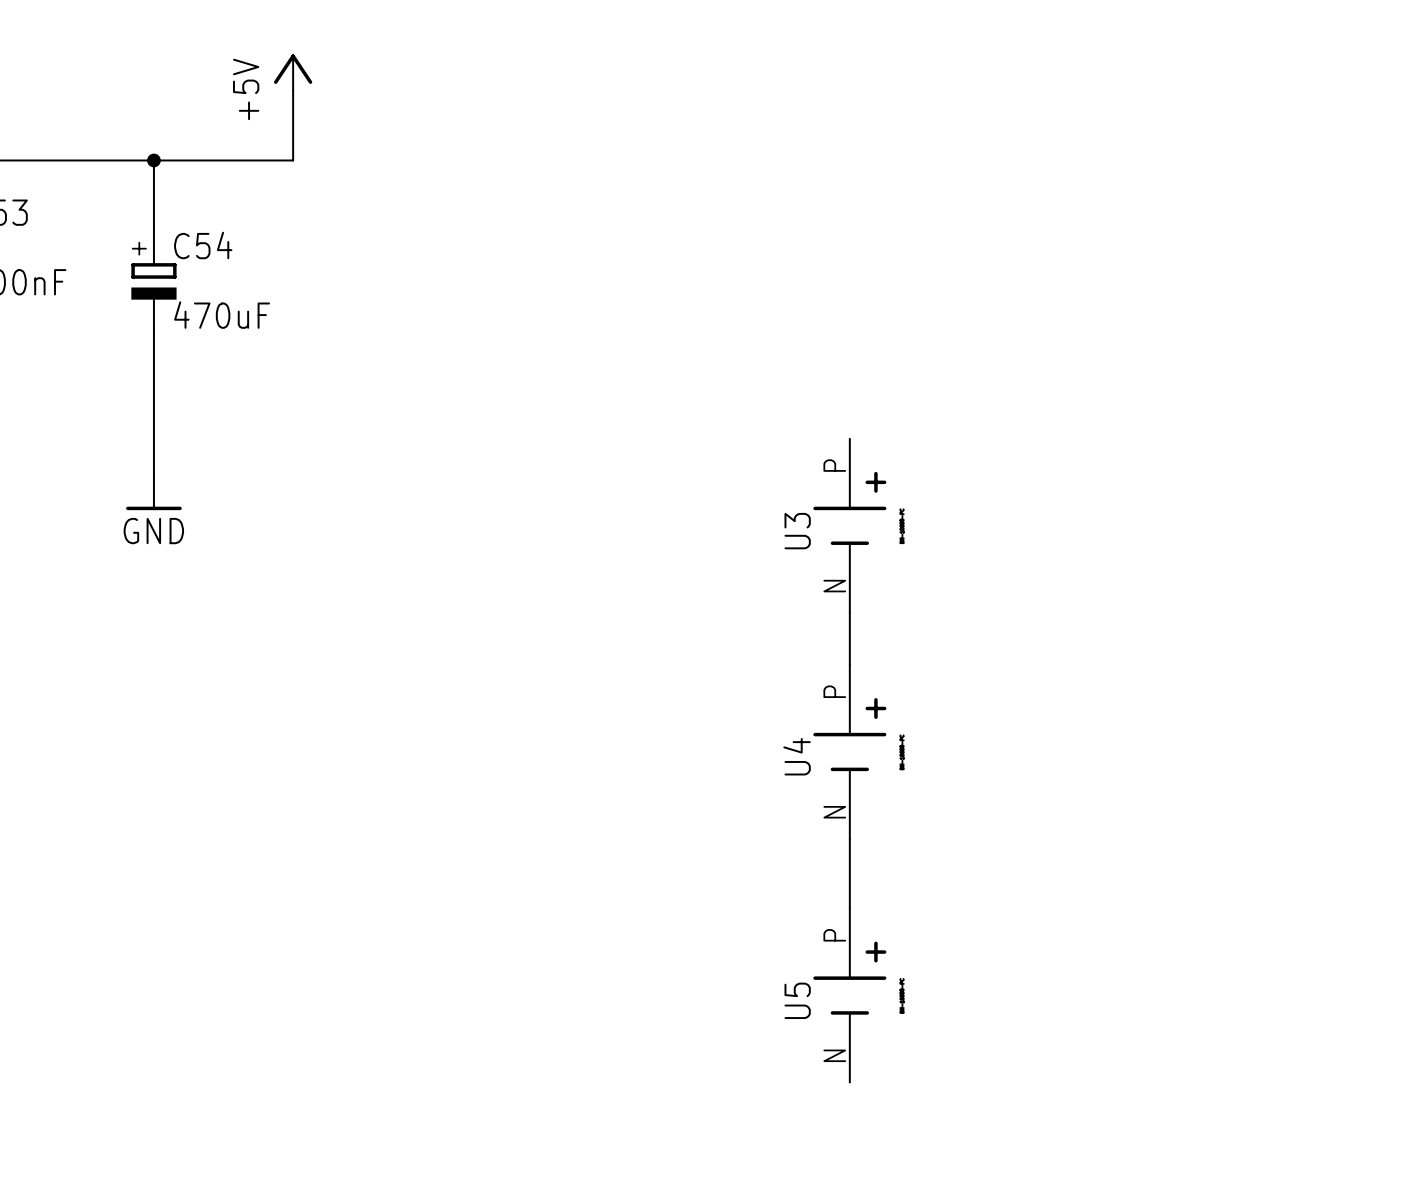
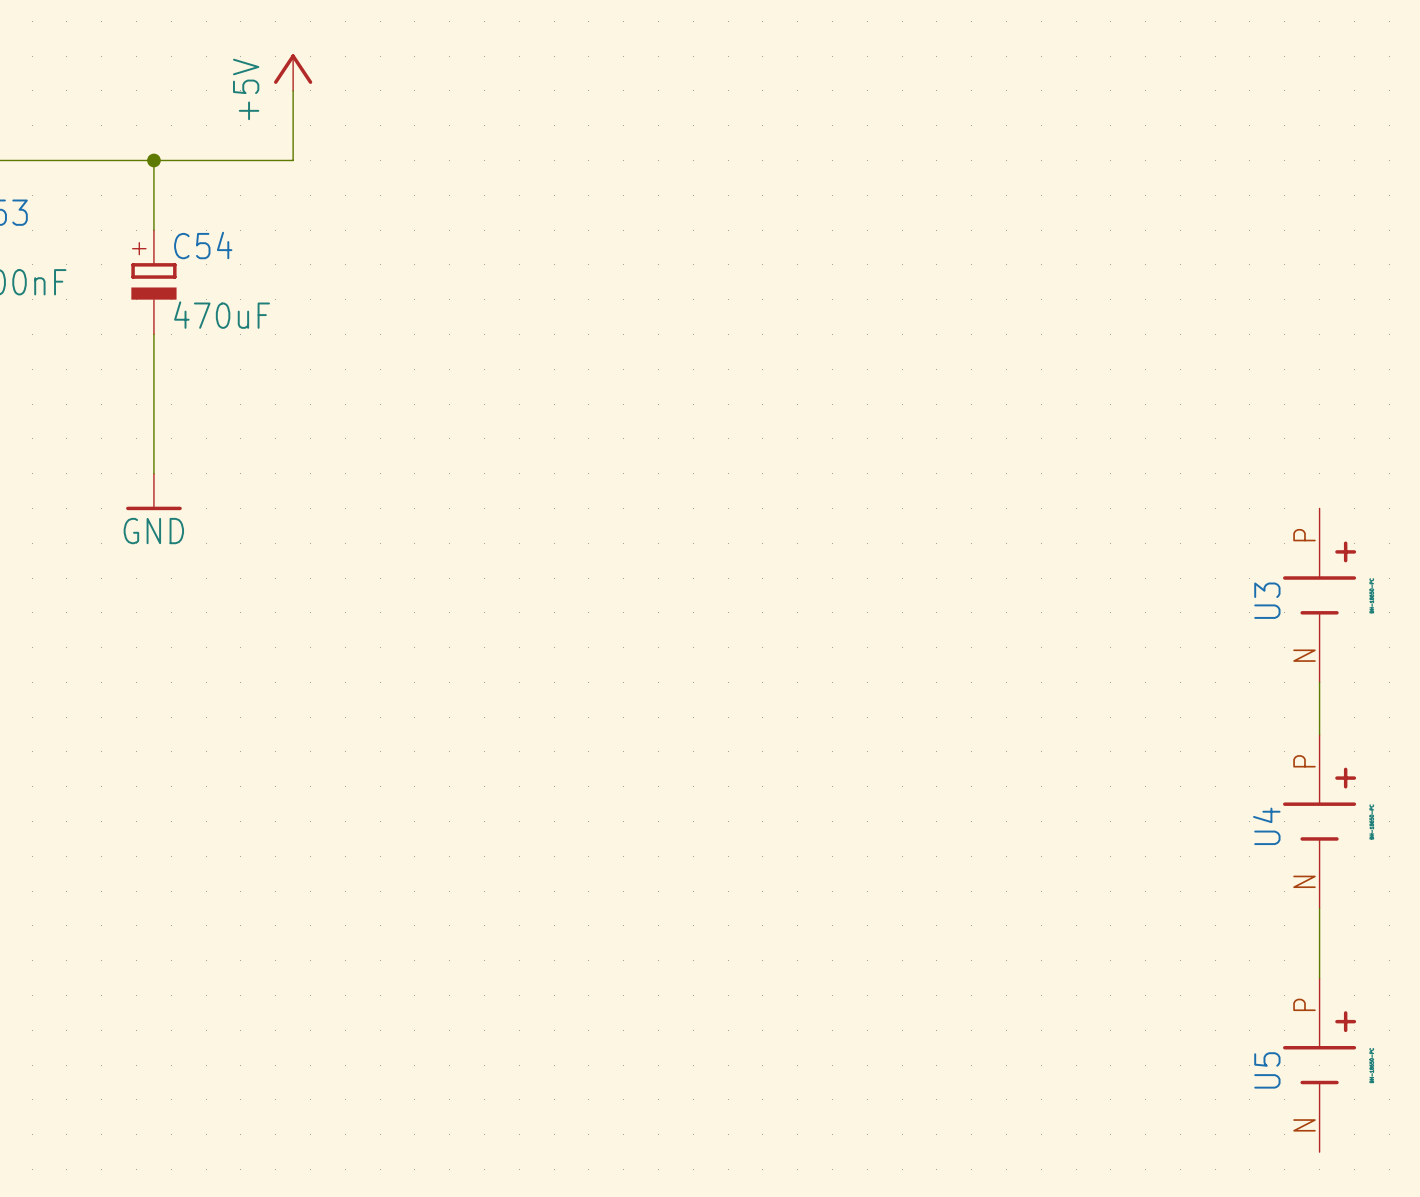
U3 position: (849, 525) -> (1319, 595)
wire: (849, 612) (849, 665) -> none
wire: none -> (1319, 682) (1319, 734)
U4 position: (849, 751) -> (1319, 821)
wire: (849, 838) (849, 908) -> none
wire: none -> (1319, 908) (1319, 978)
U5 position: (849, 995) -> (1319, 1065)

